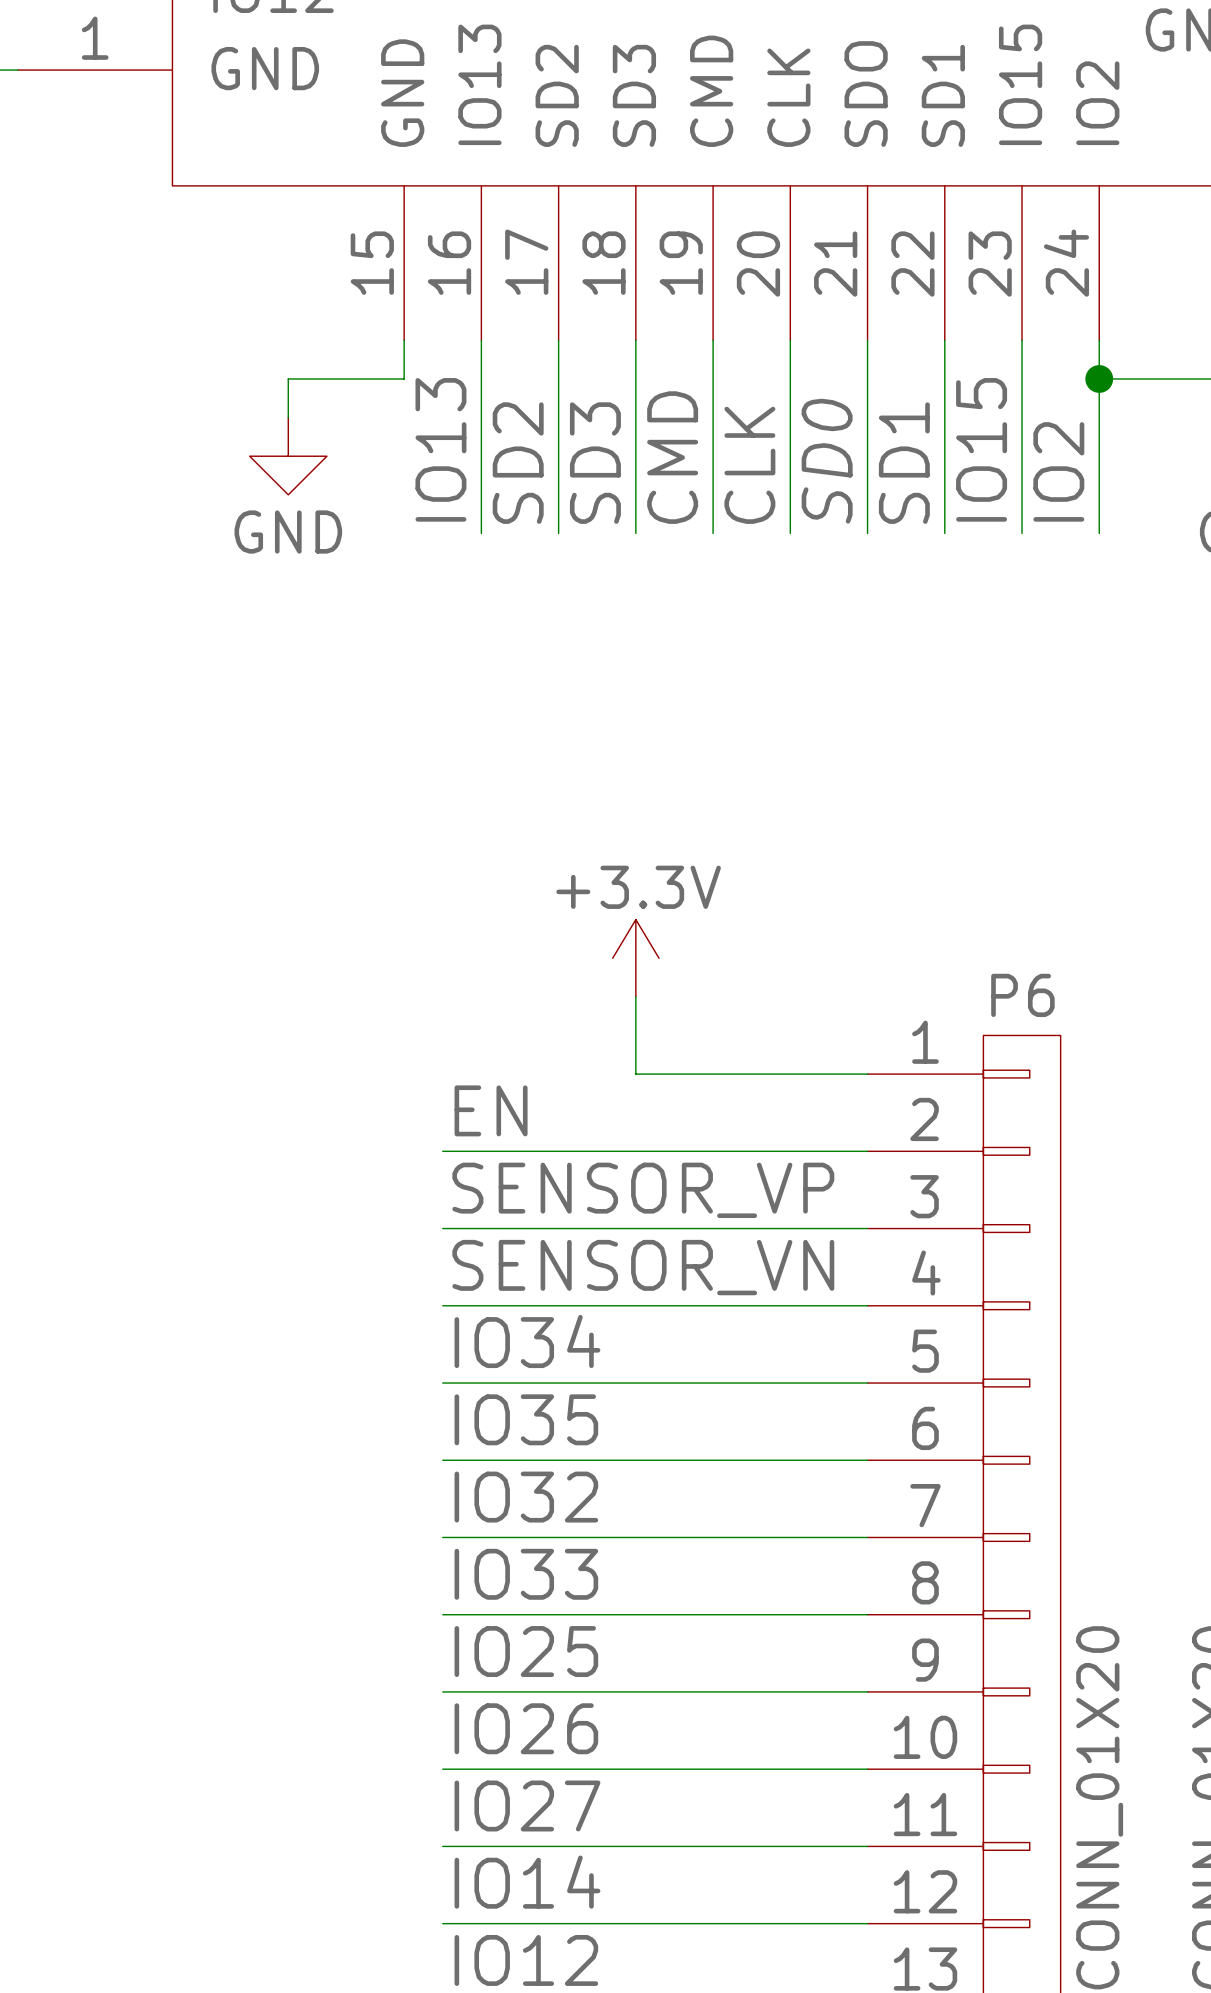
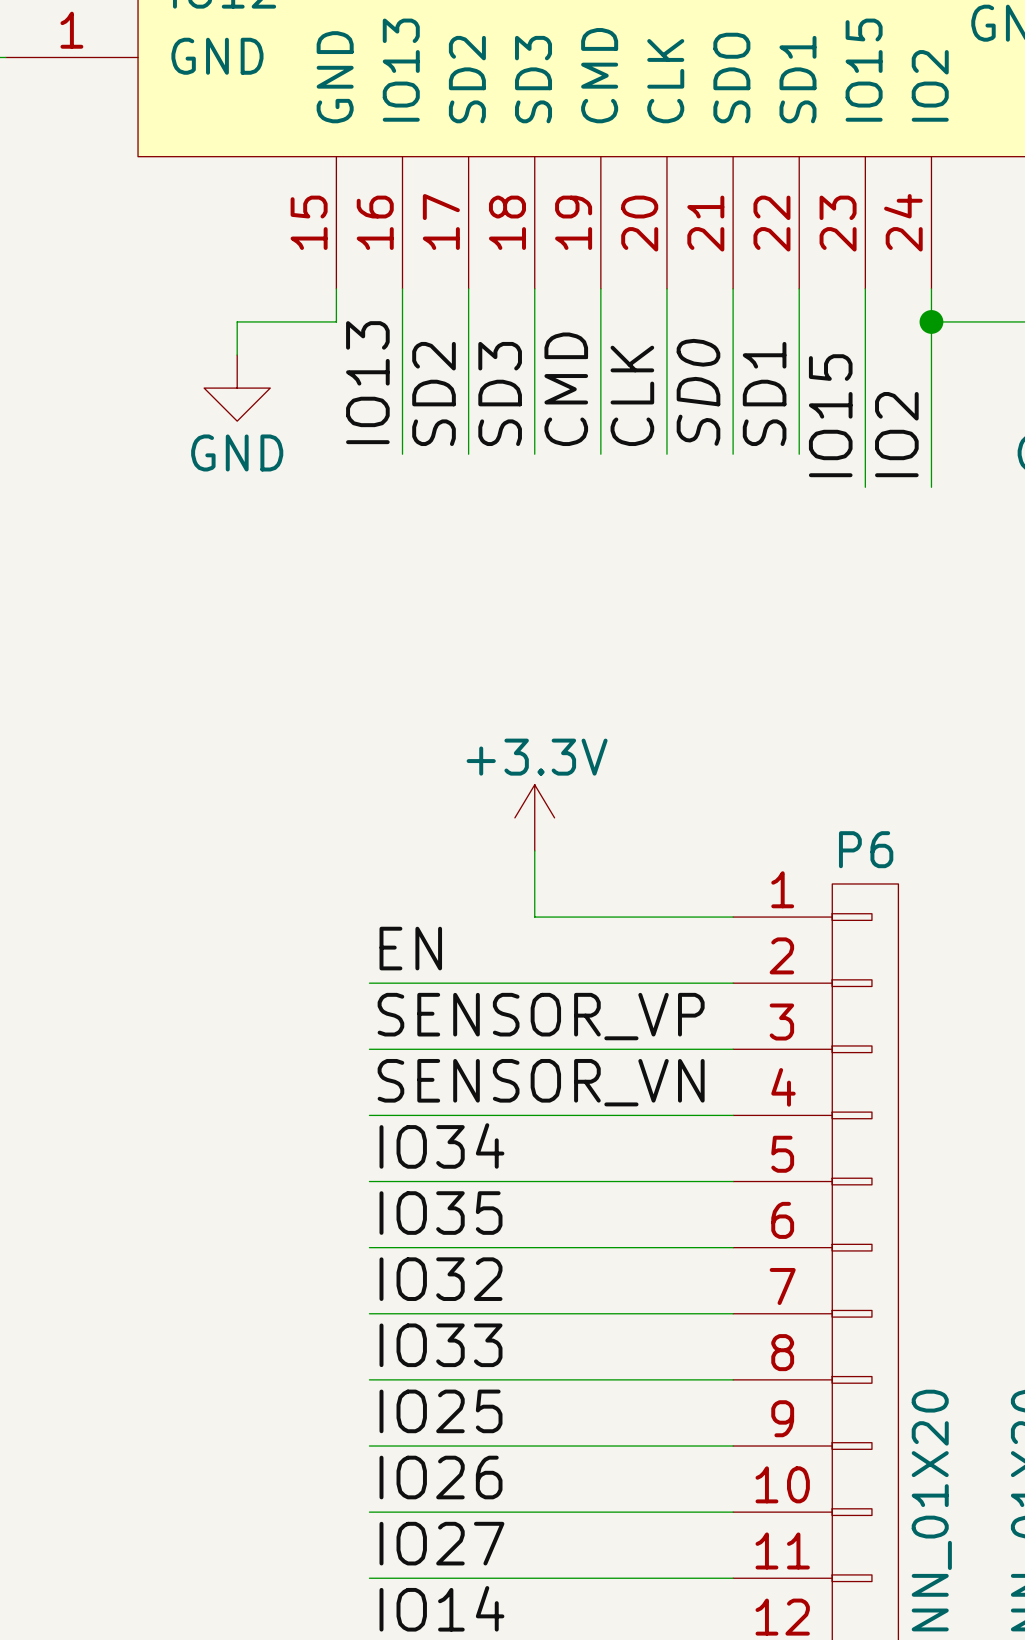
label position: IO15 (981, 449) -> IO15 (830, 415)
label position: IO2 (1058, 471) -> IO2 (896, 434)
wire: none -> (865, 454) (865, 487)
wire: none -> (931, 454) (931, 487)

